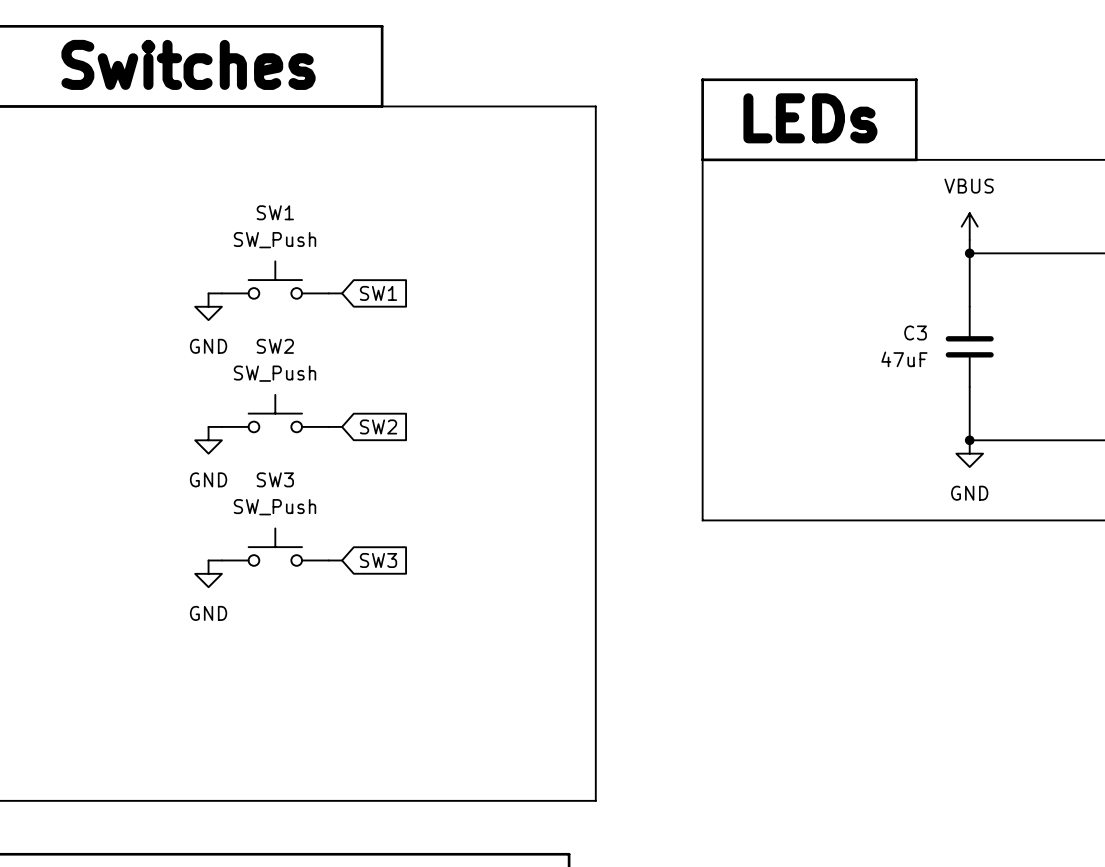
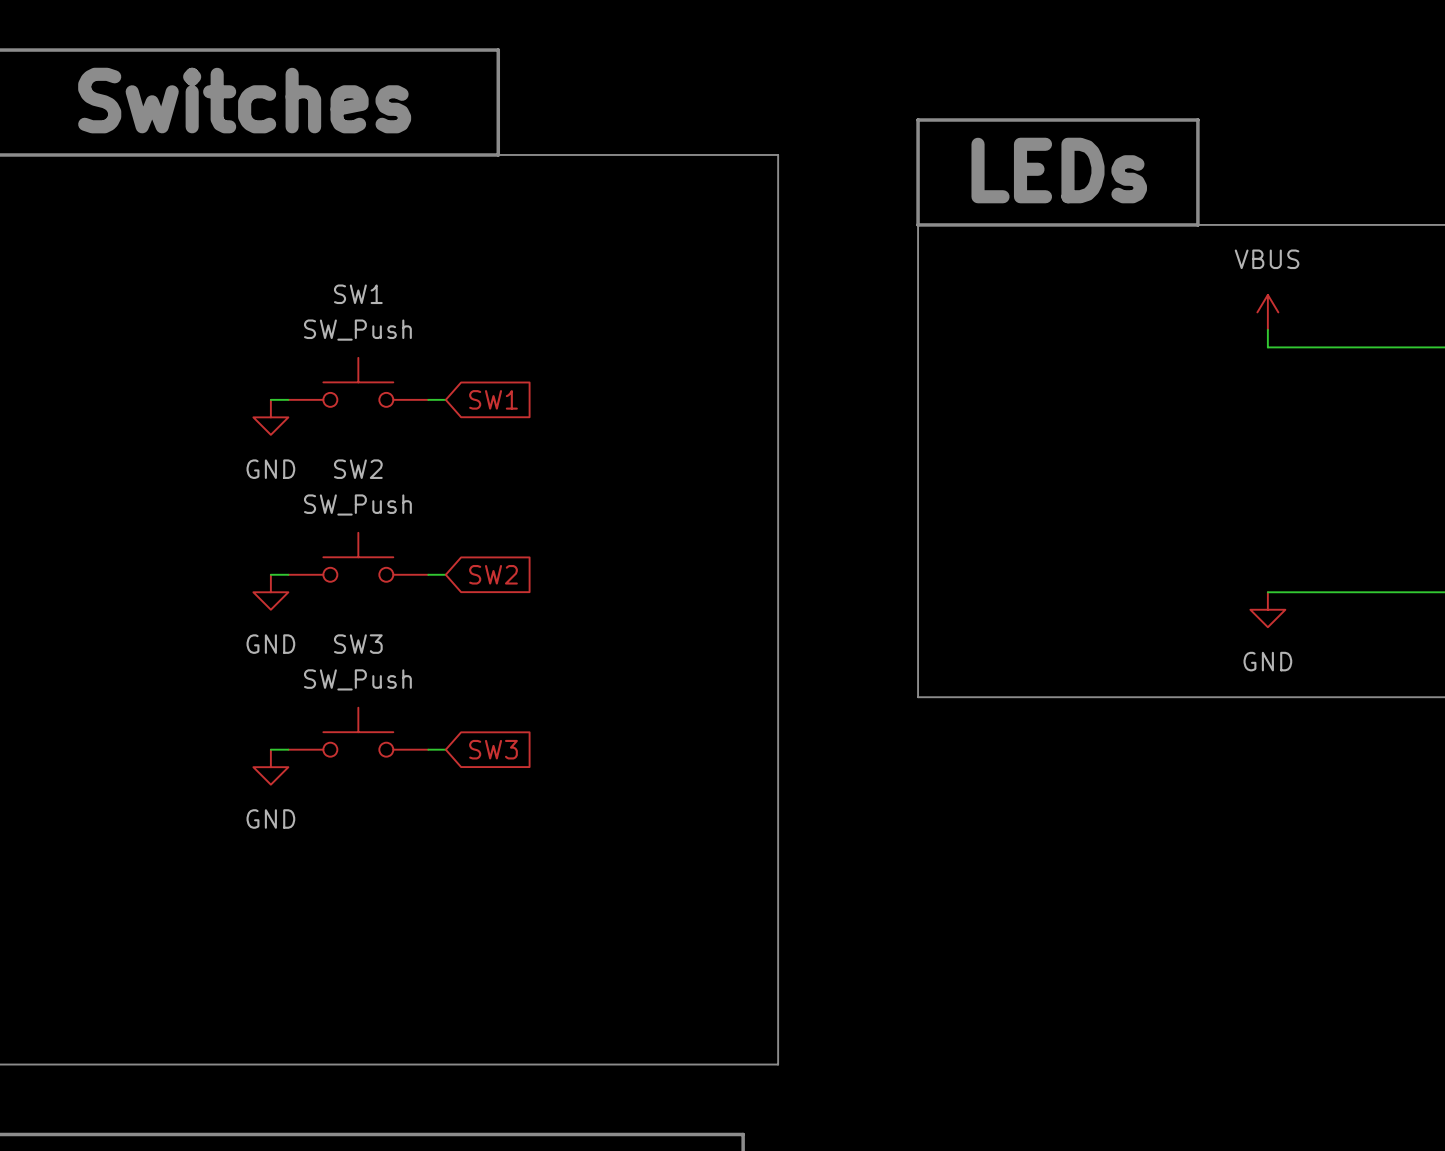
wire: (969, 253) (969, 306) -> none
junction: (969, 253) -> none
C3: 47uF (969, 346) -> none
wire: (969, 386) (969, 440) -> none
junction: (969, 440) -> none

